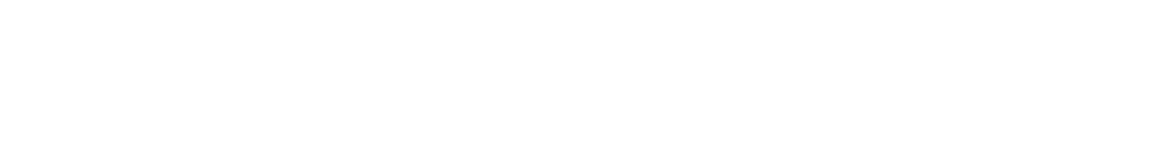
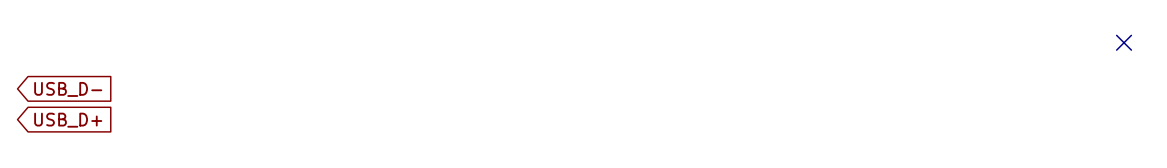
no-connect mark: none -> (1124, 42)
global label: none -> USB_D- (68, 89)
global label: none -> USB_D+ (68, 120)

